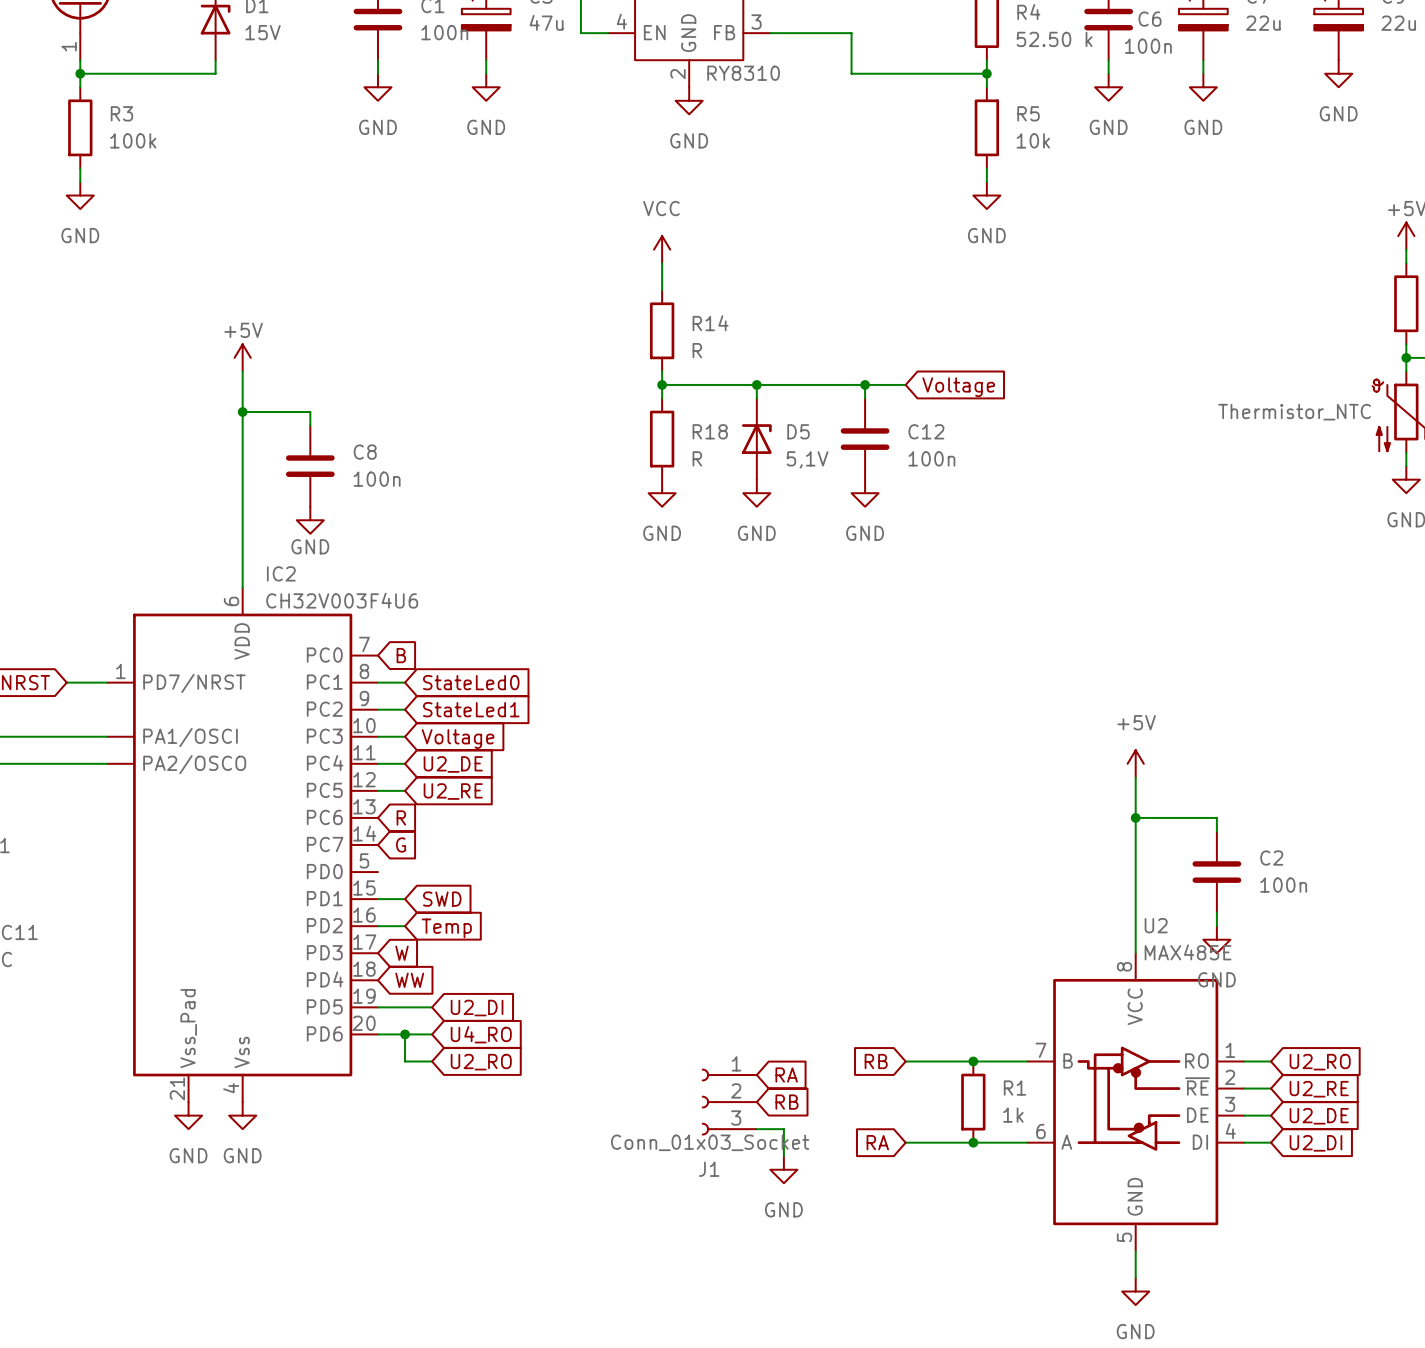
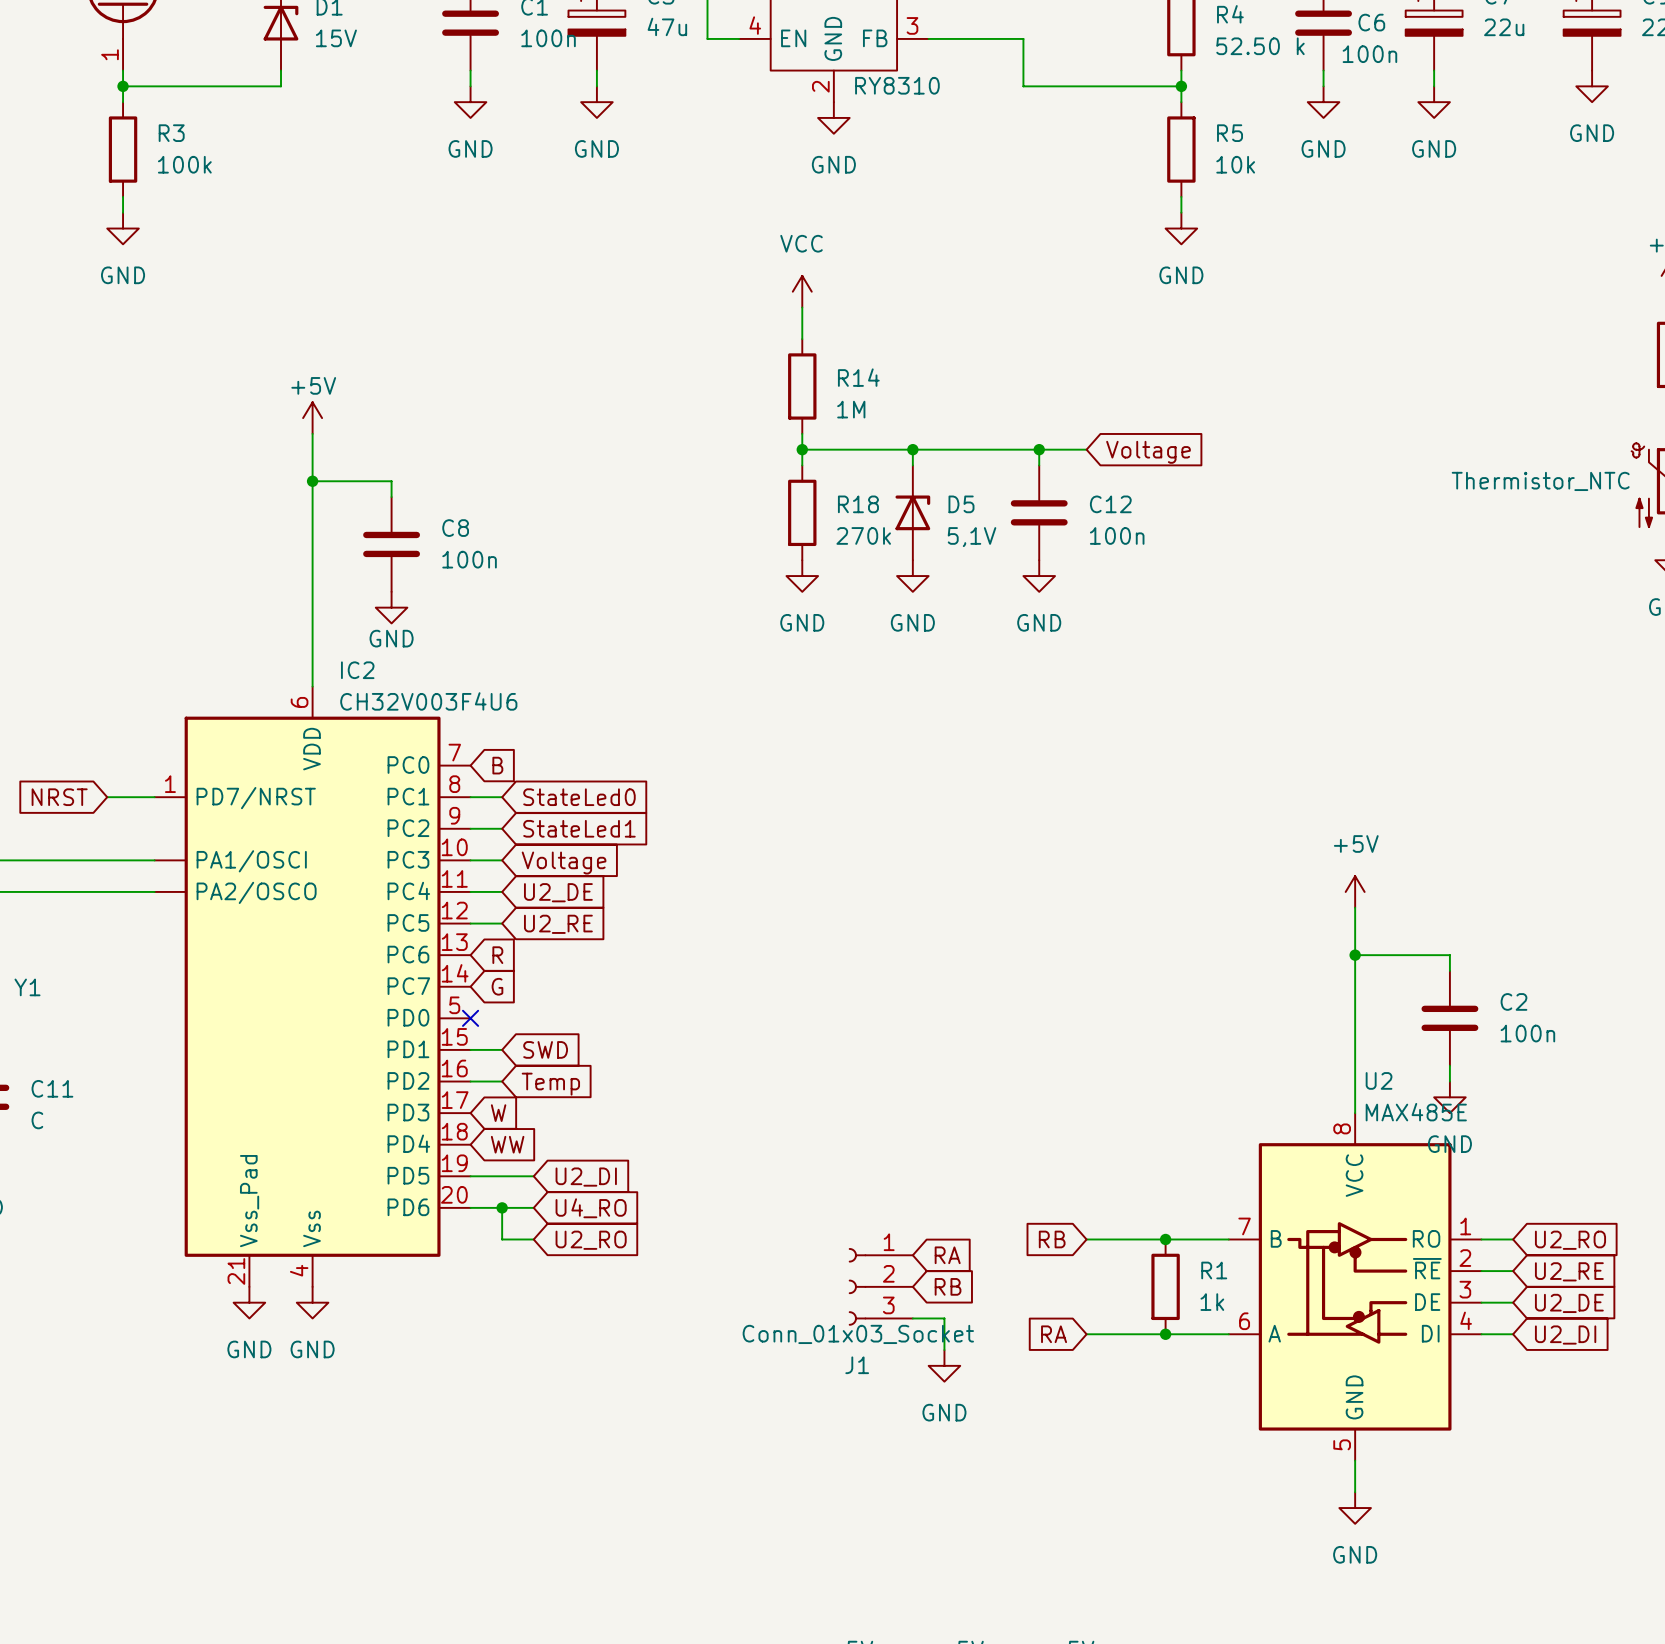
R14 value: R (697, 350) -> 1M (851, 409)
R18 value: R (697, 458) -> 270k (863, 535)
no-connect mark: none -> (470, 1018)

